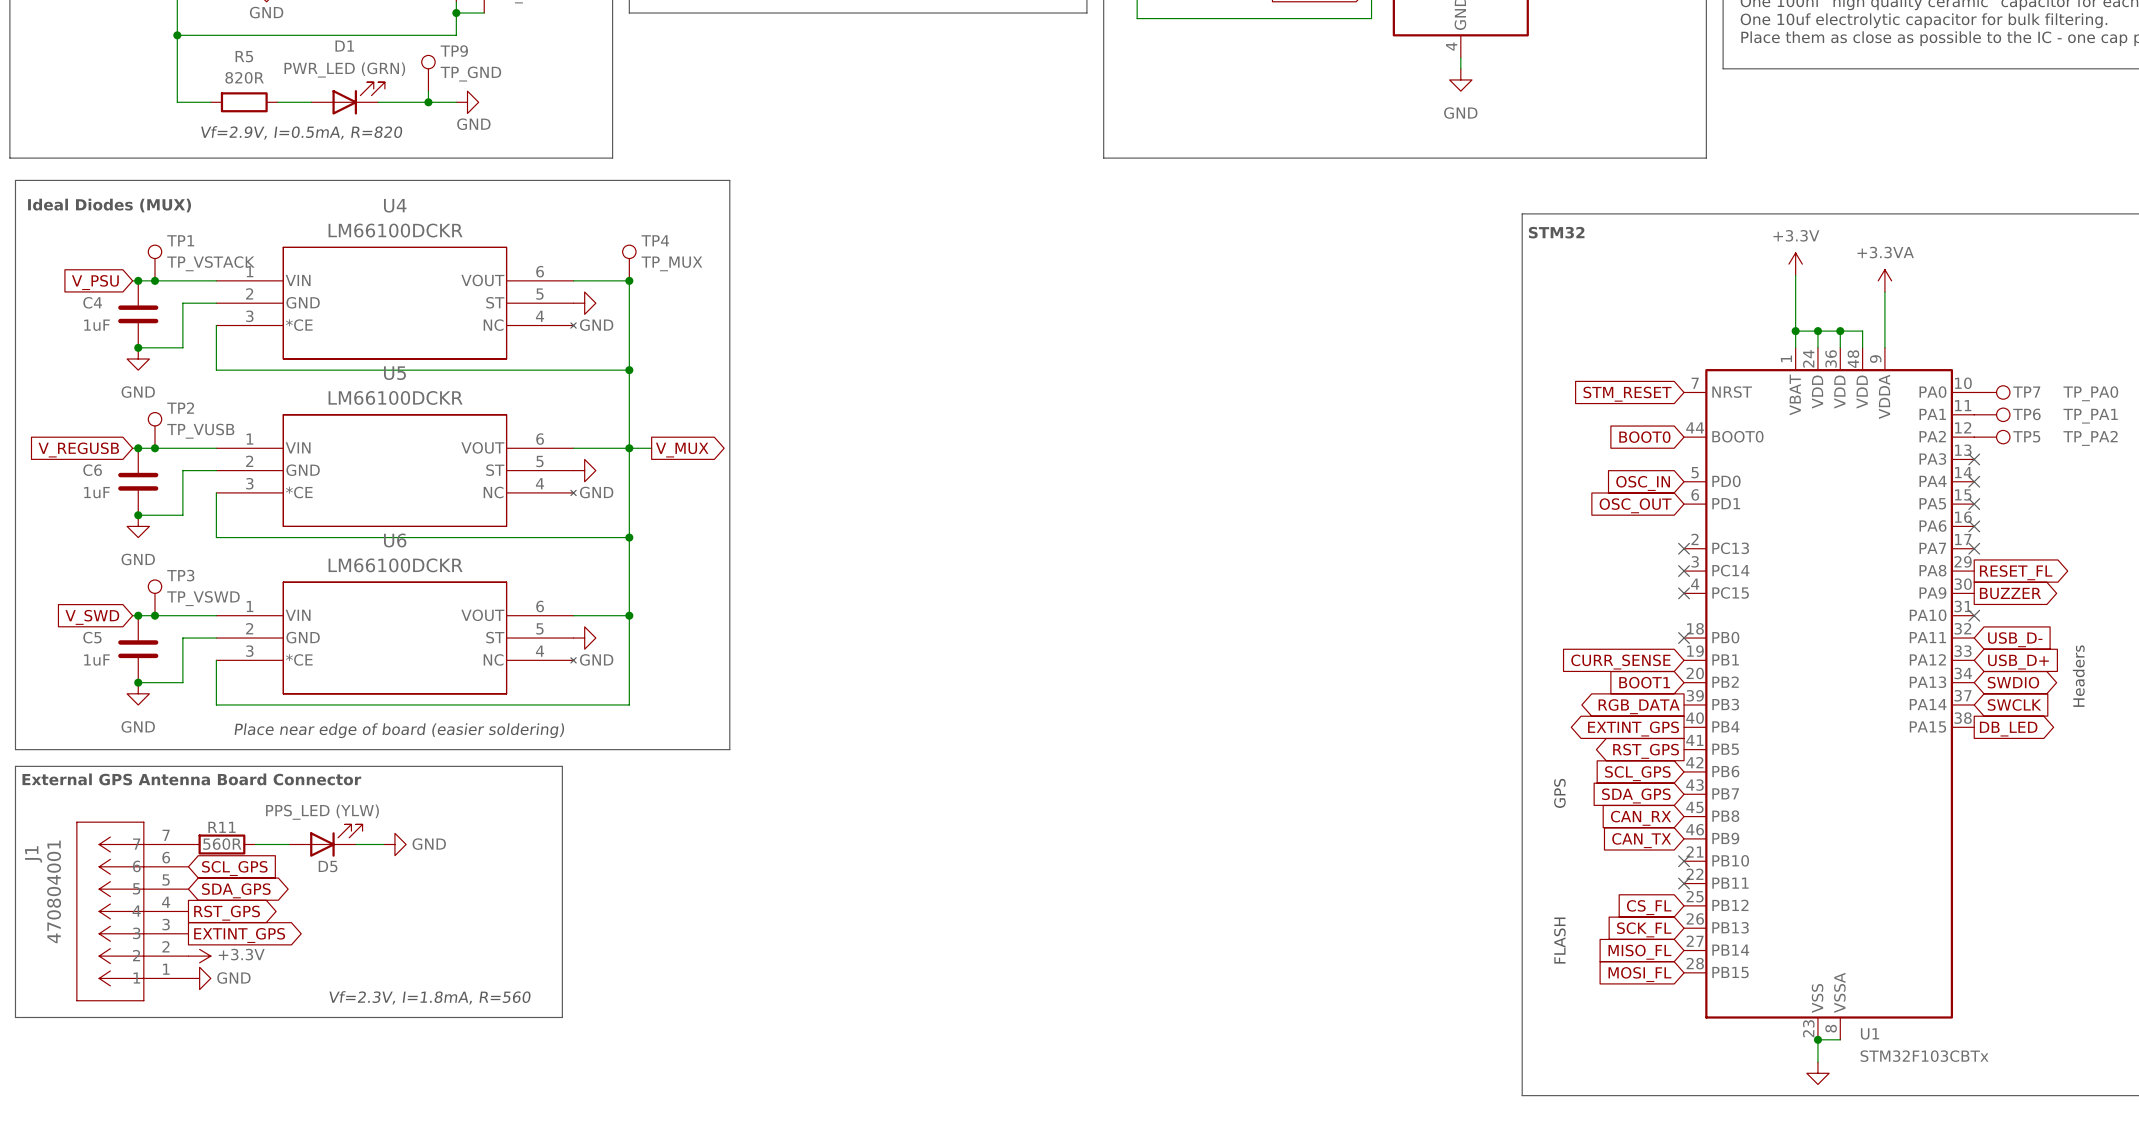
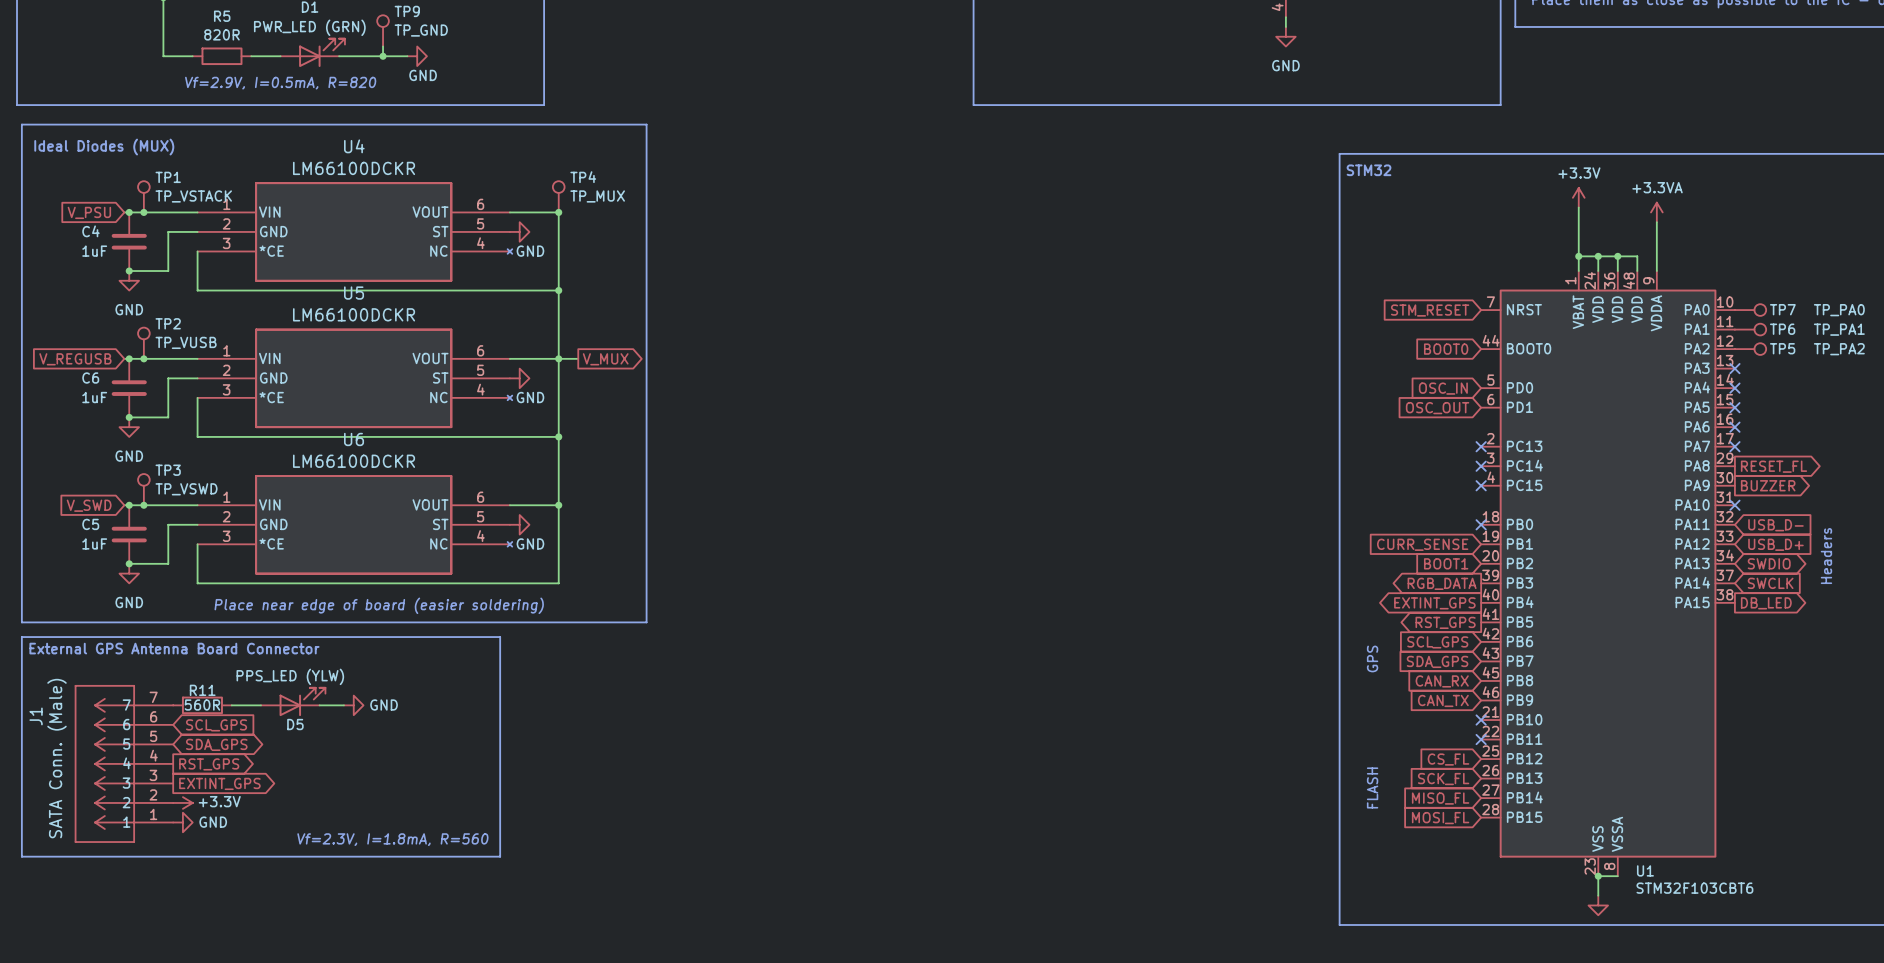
J1 value: 470804001 (54, 891) -> SATA Conn. (Male) (57, 758)
U1 value: STM32F103CBTx (1924, 1056) -> STM32F103CBT6 (1694, 888)

